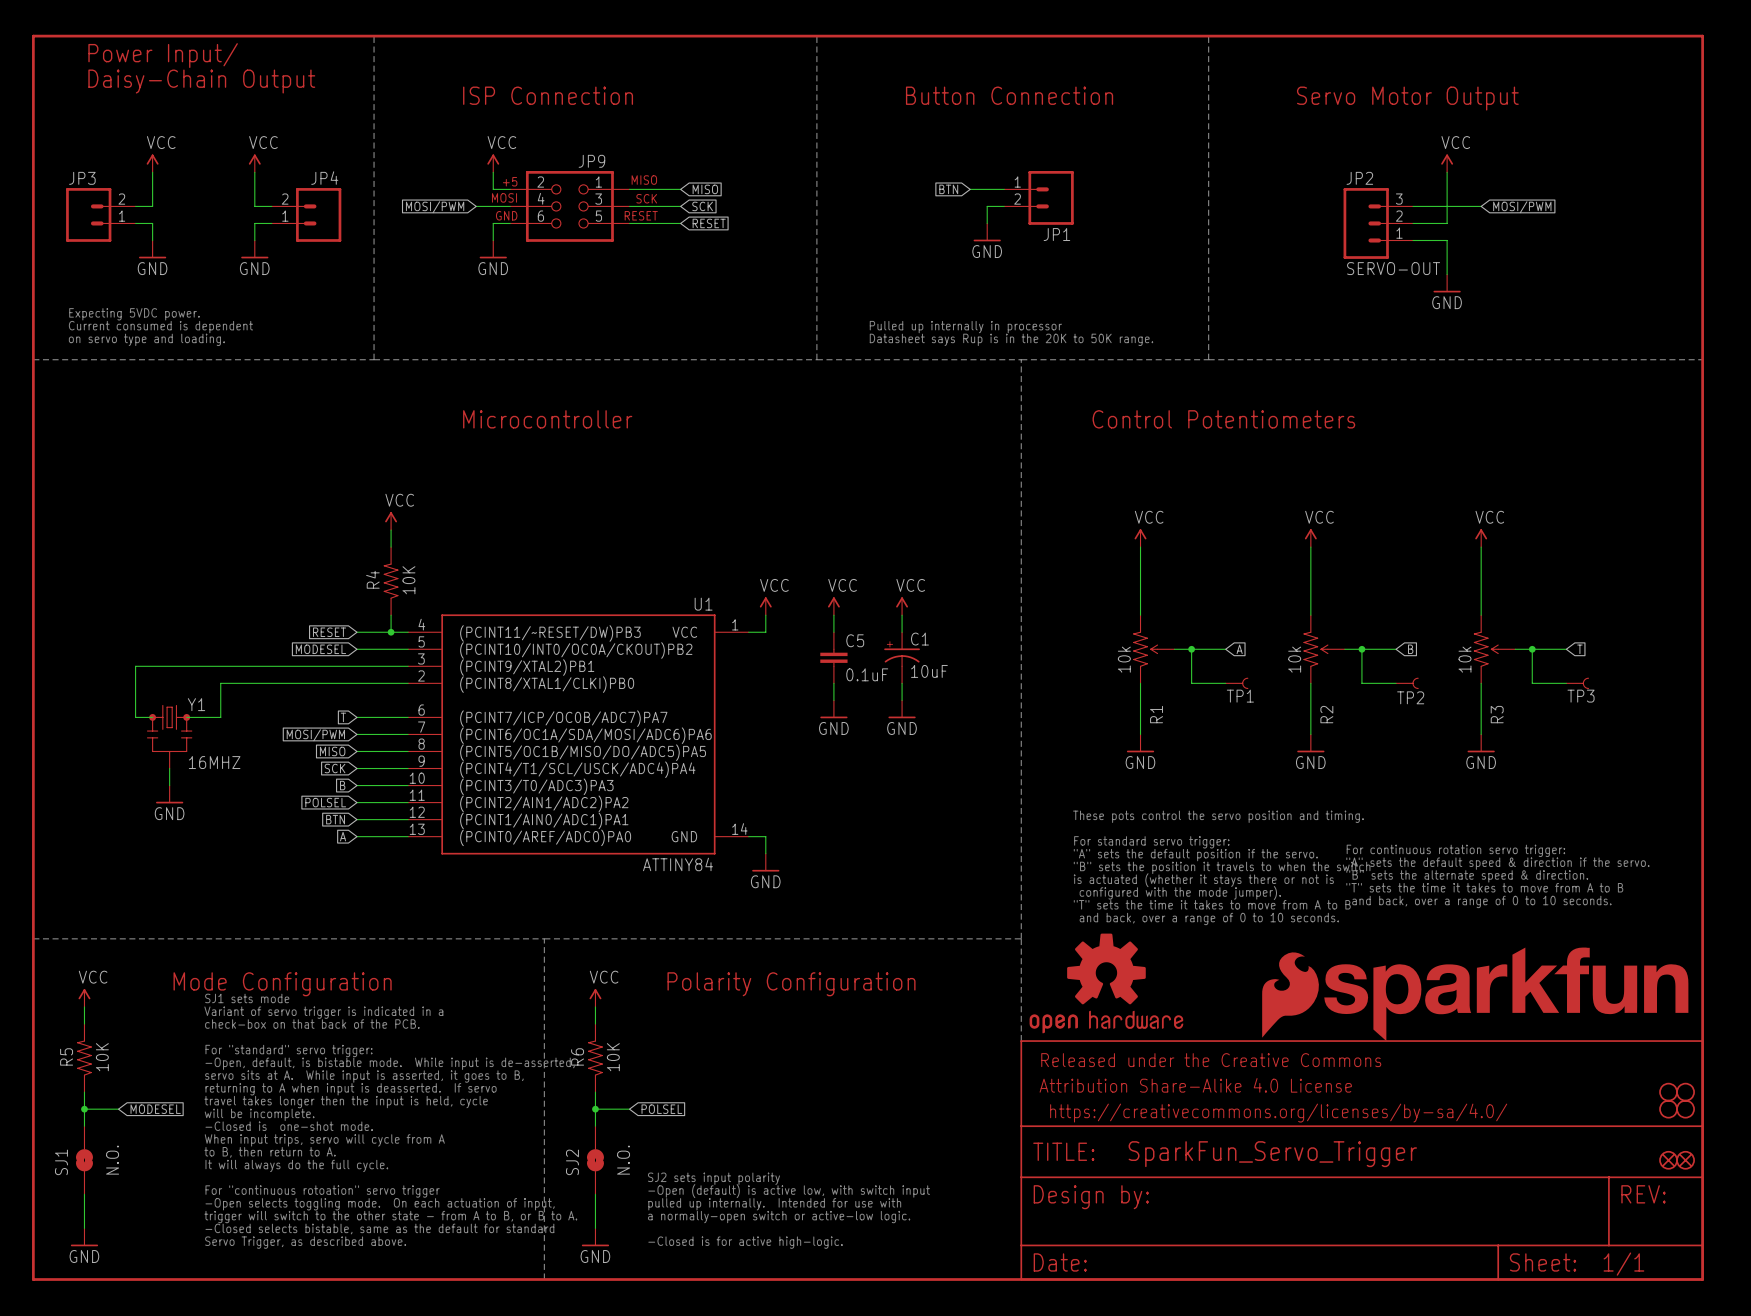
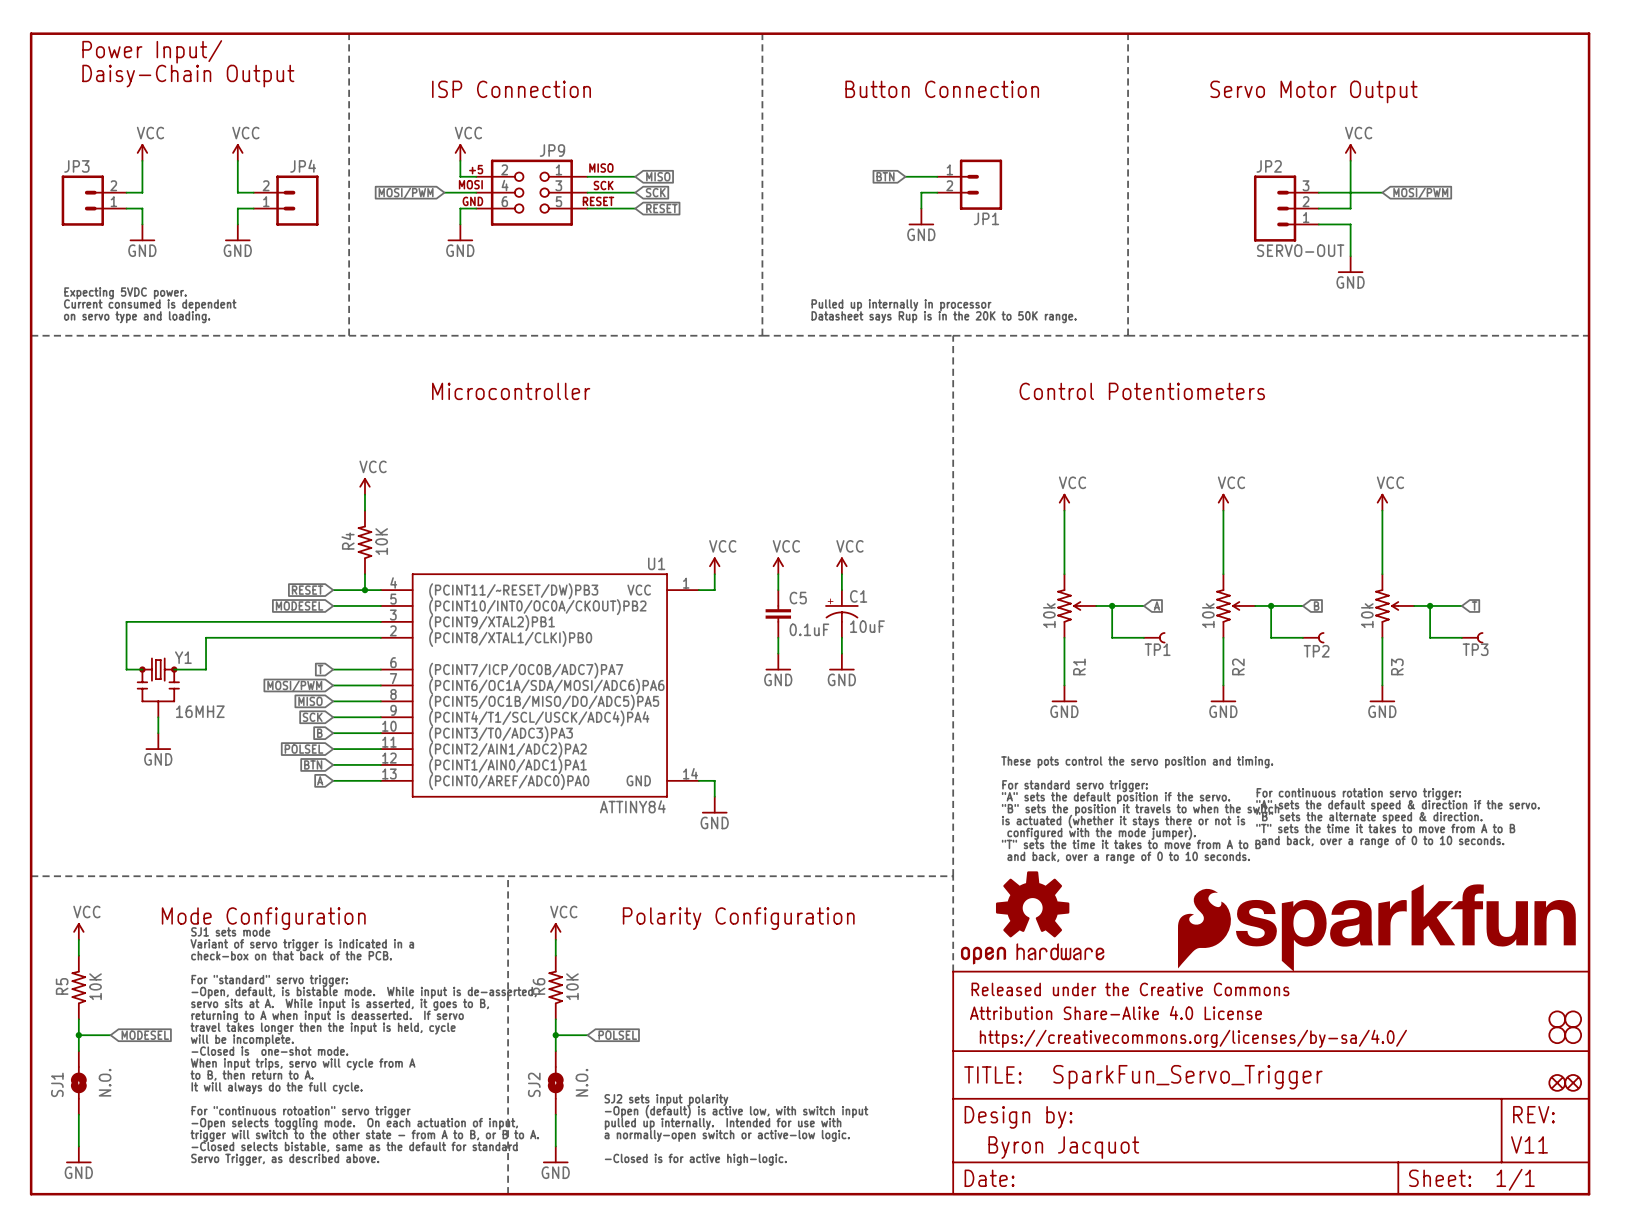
part text: none -> V11 (1529, 1144)
part text: none -> Byron Jacquot (1063, 1147)

